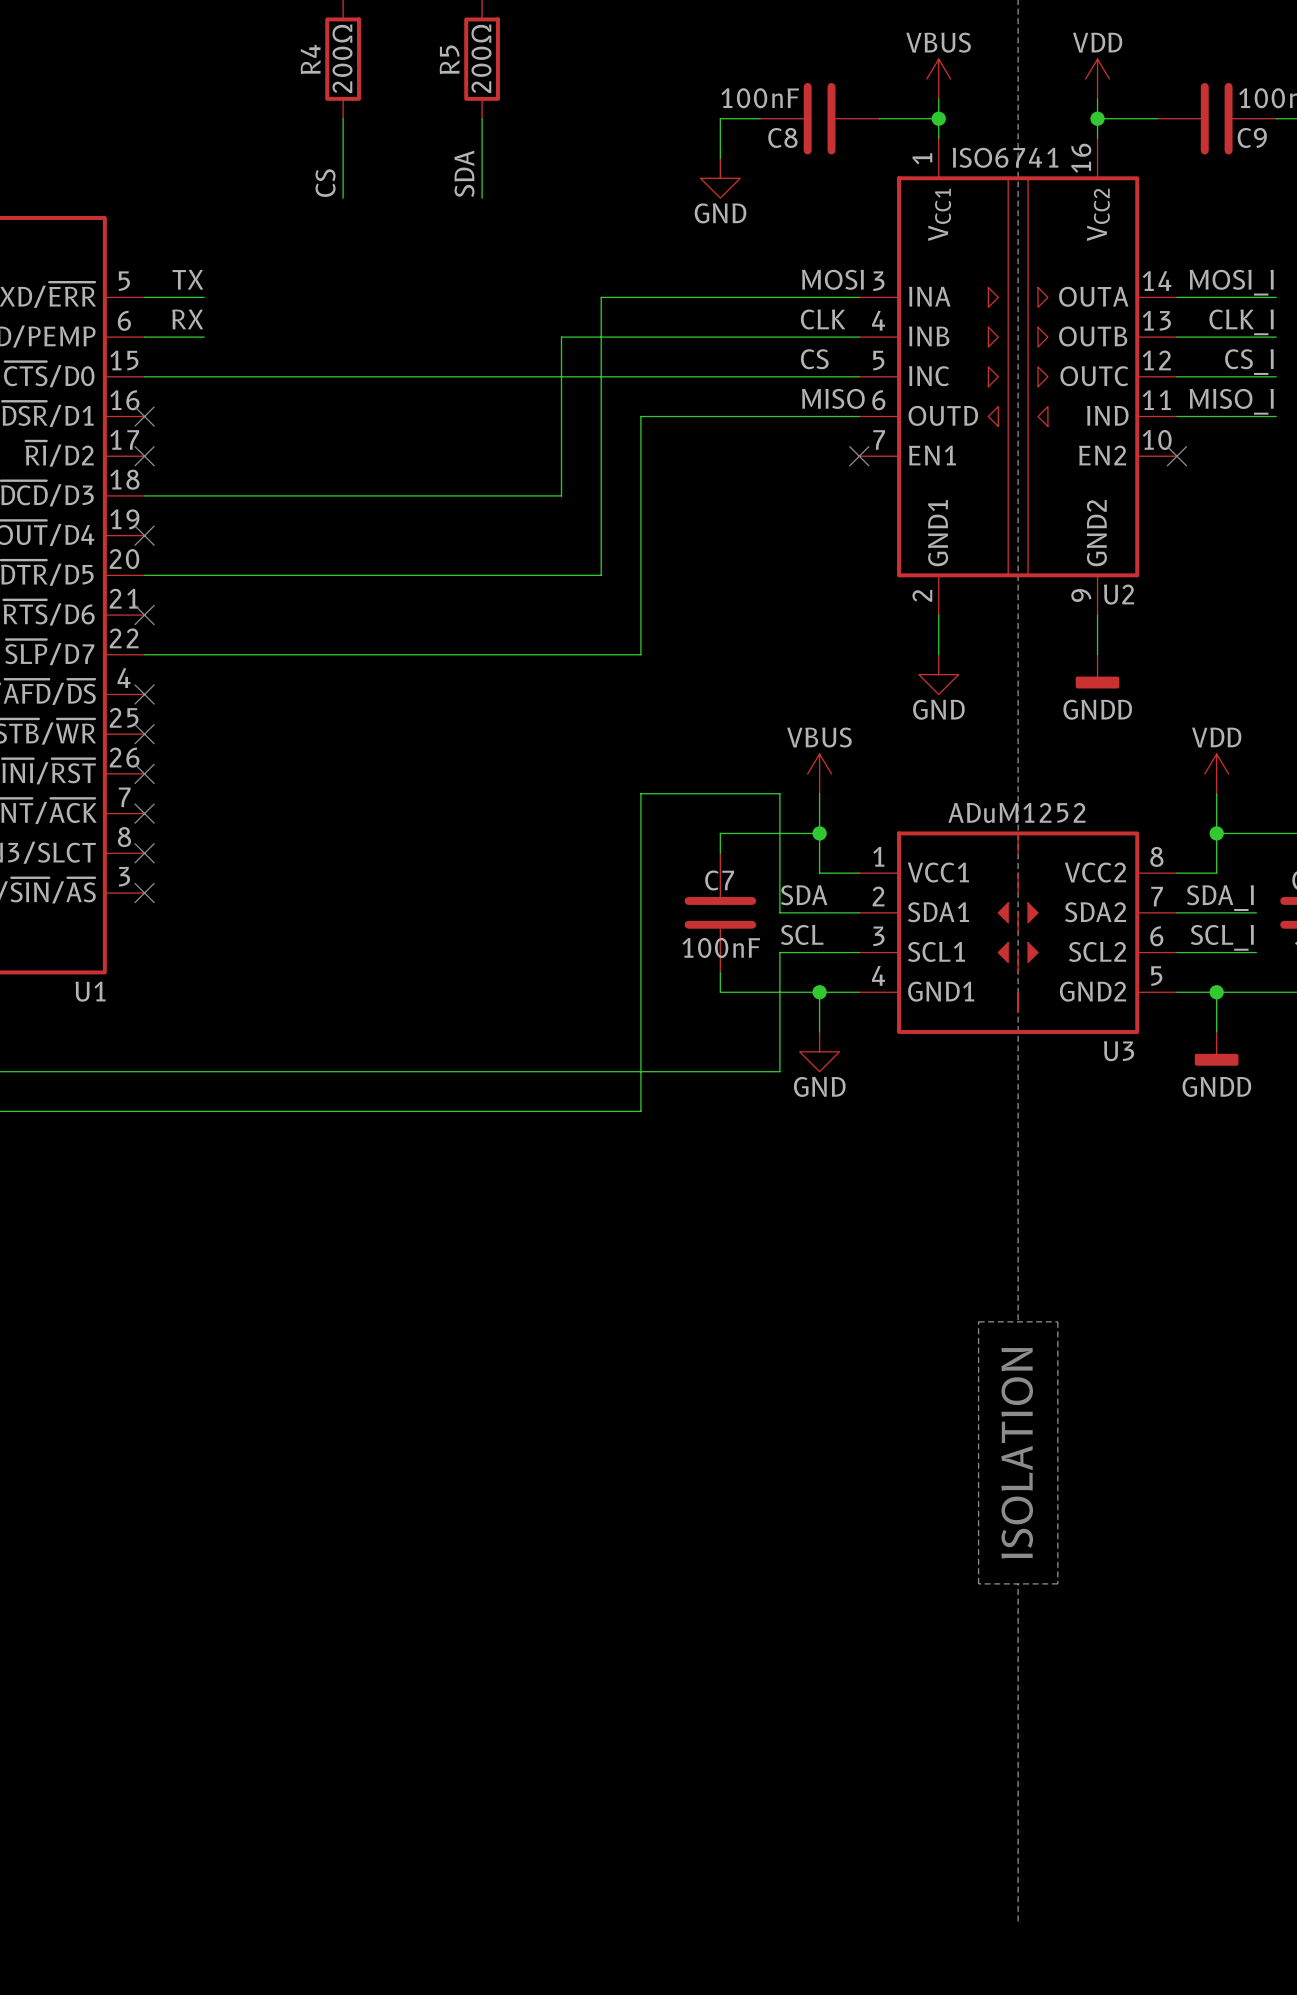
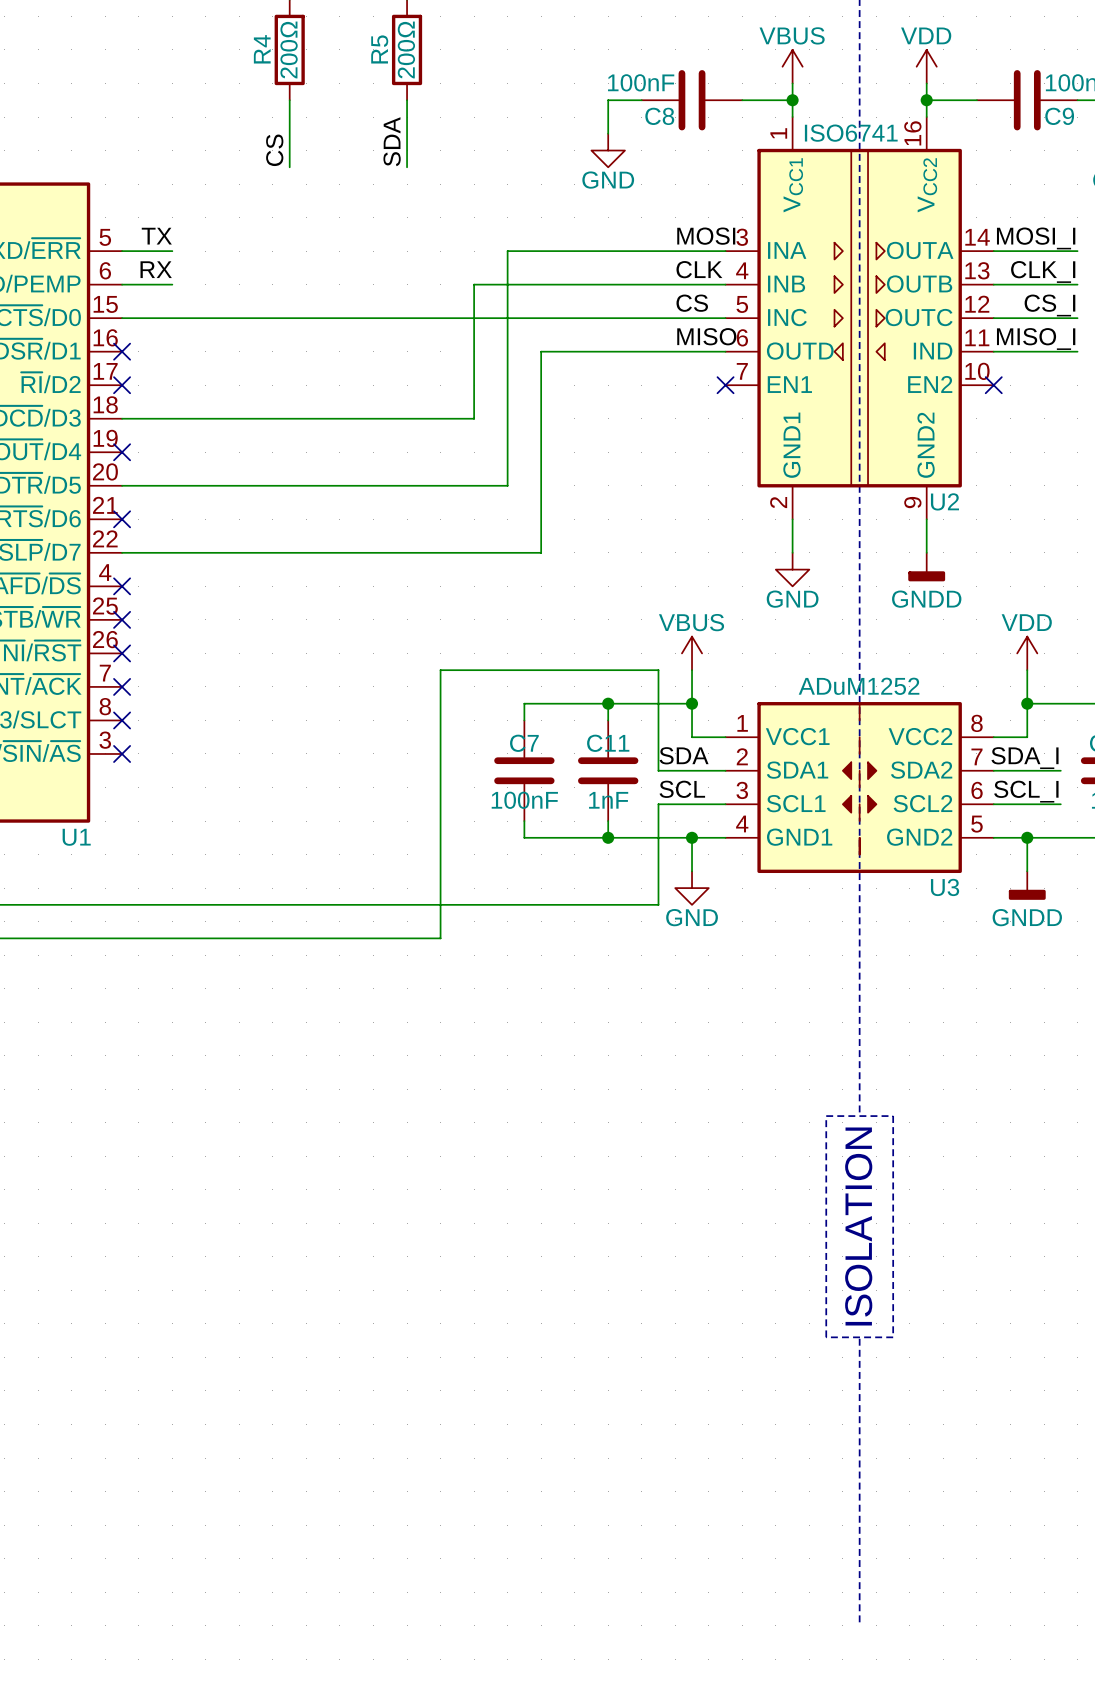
wire: (640, 793) (640, 1111) (521, 1111) -> (541, 670) (440, 670) (440, 938)
wire: none -> (608, 703) (524, 703) (524, 720)
junction: none -> (608, 703)
C7 name: C7 (719, 880) -> C11 (608, 743)
C7: none -> 100nF (524, 770)
C7 value: 100nF (721, 947) -> 1nF (608, 800)
wire: none -> (524, 821) (524, 837) (608, 837)
junction: none -> (608, 837)

